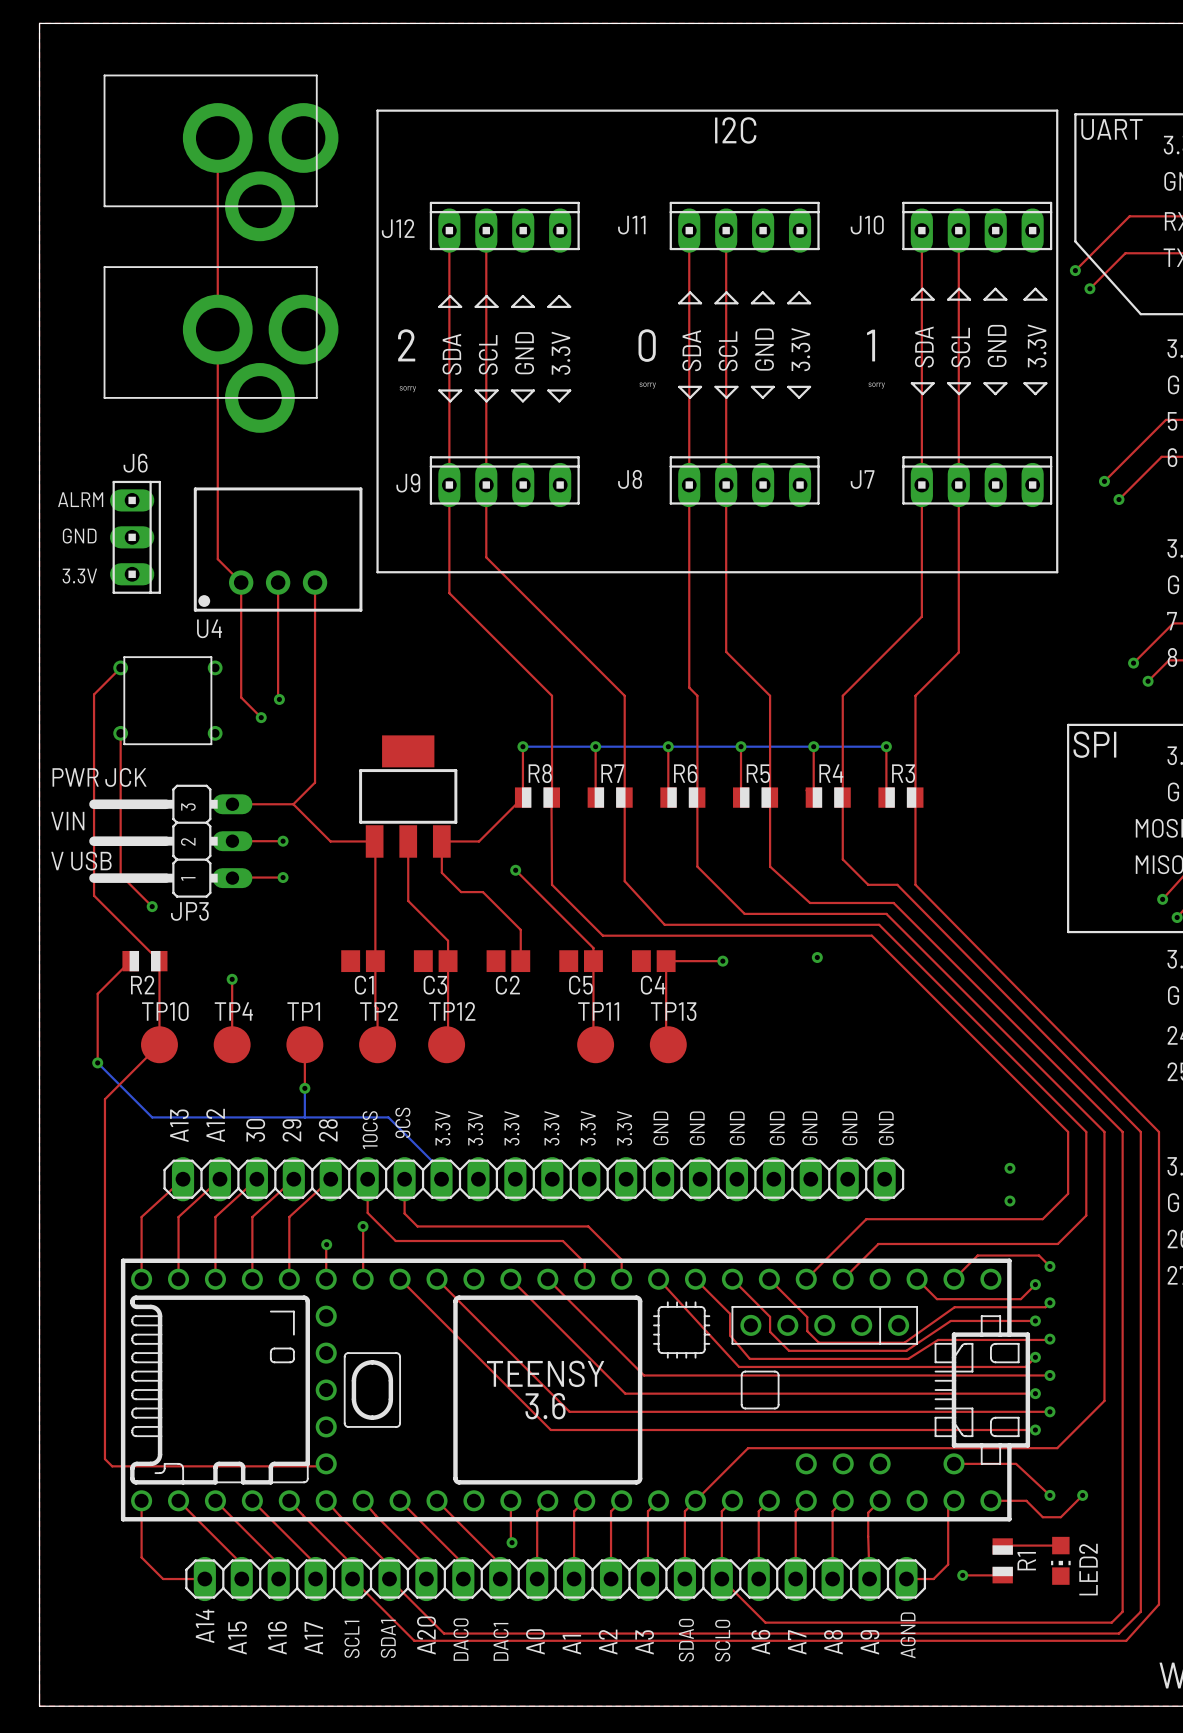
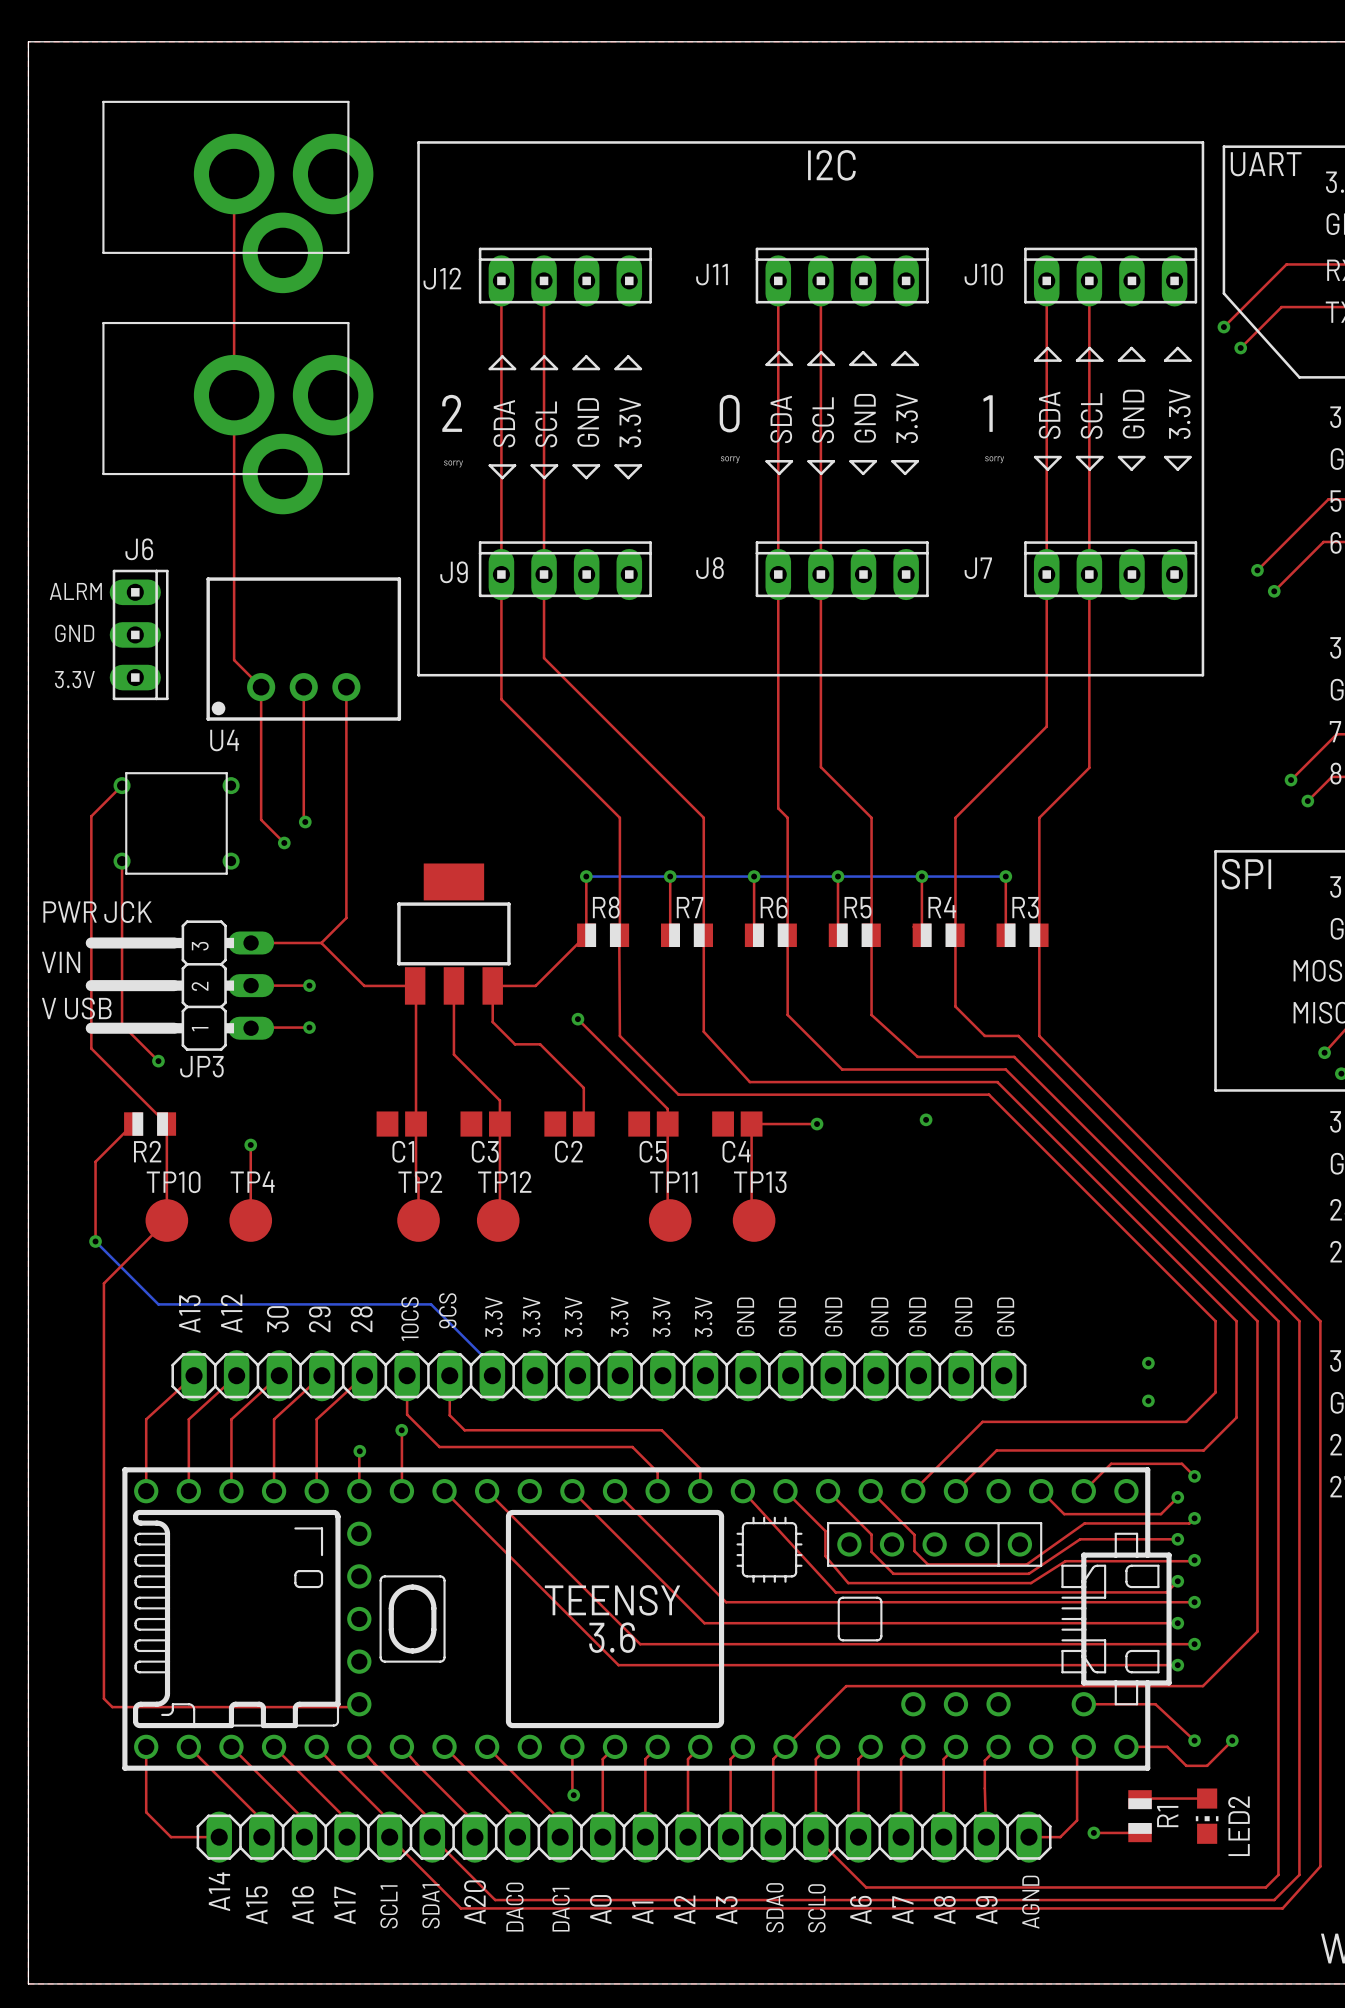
top track: (304, 1044) (304, 1088) -> none
TP1: (304, 1044) -> none
bottom track: (304, 1088) (304, 1117) -> none
via: (304, 1088) -> none

